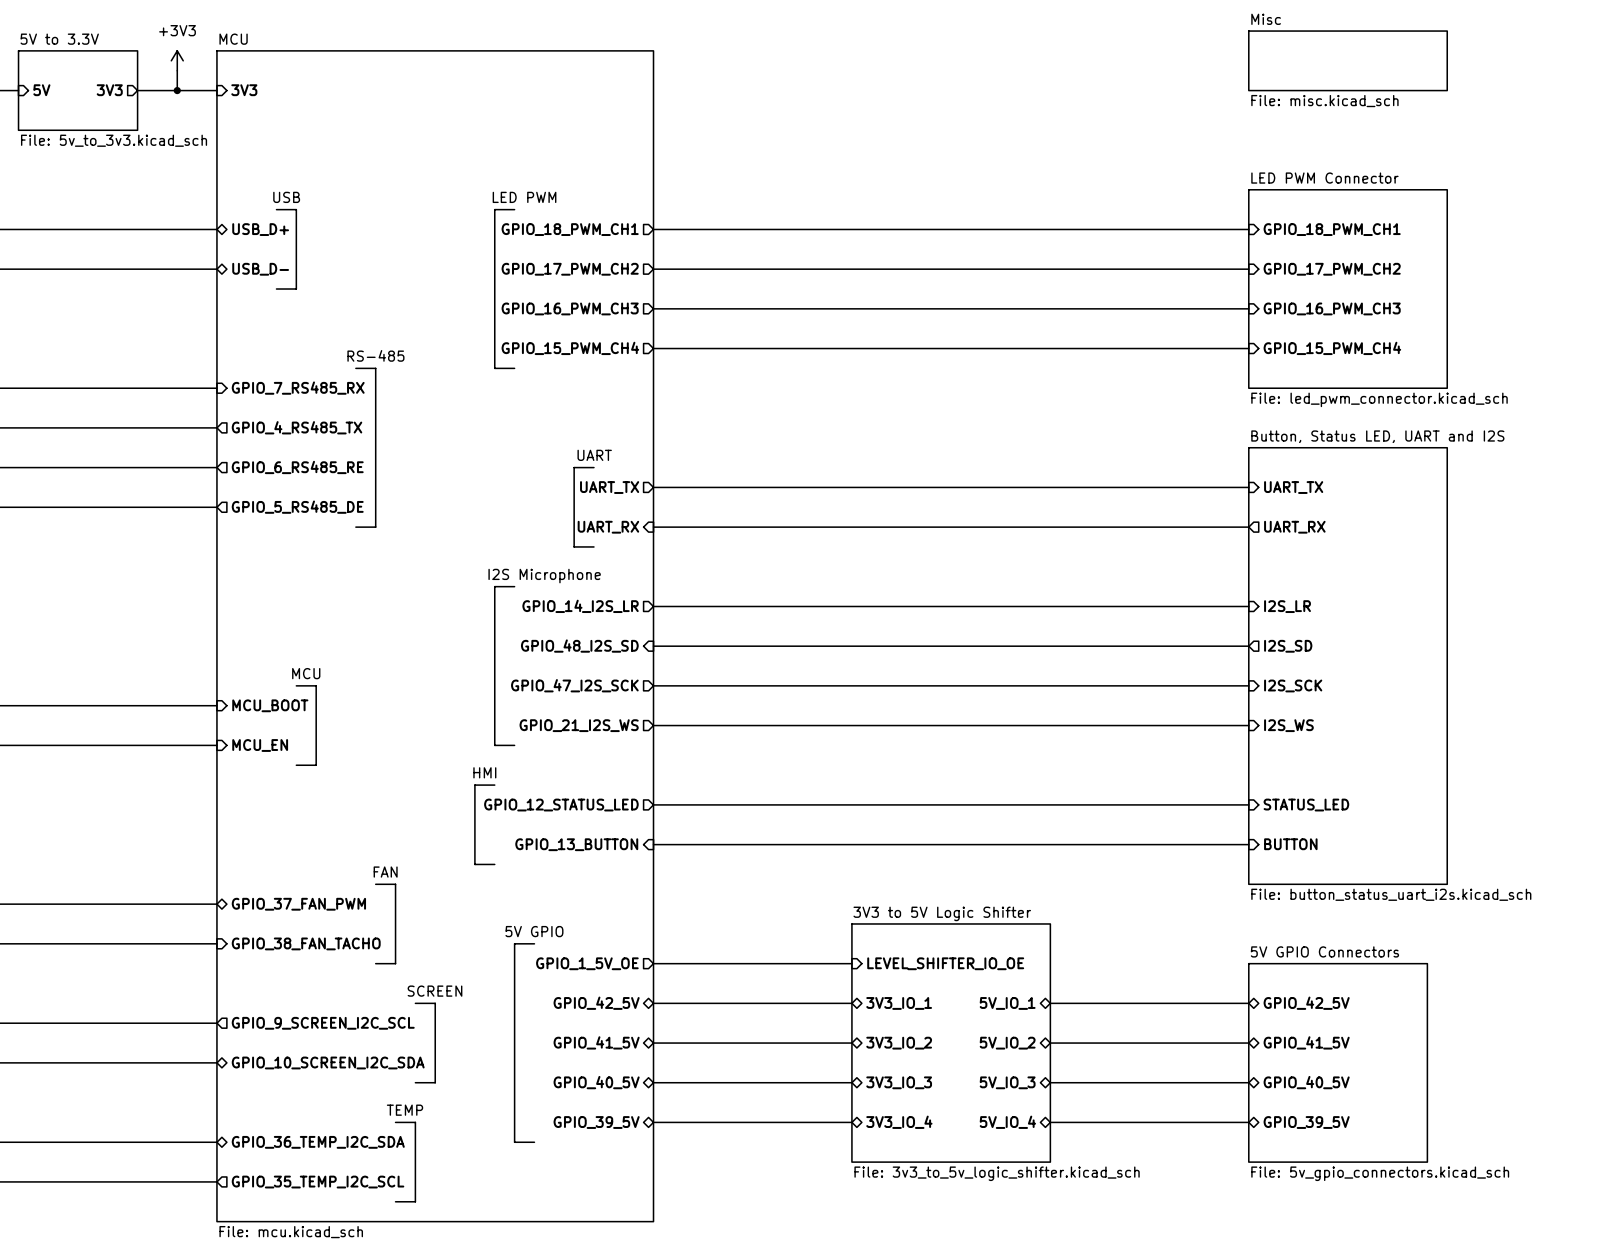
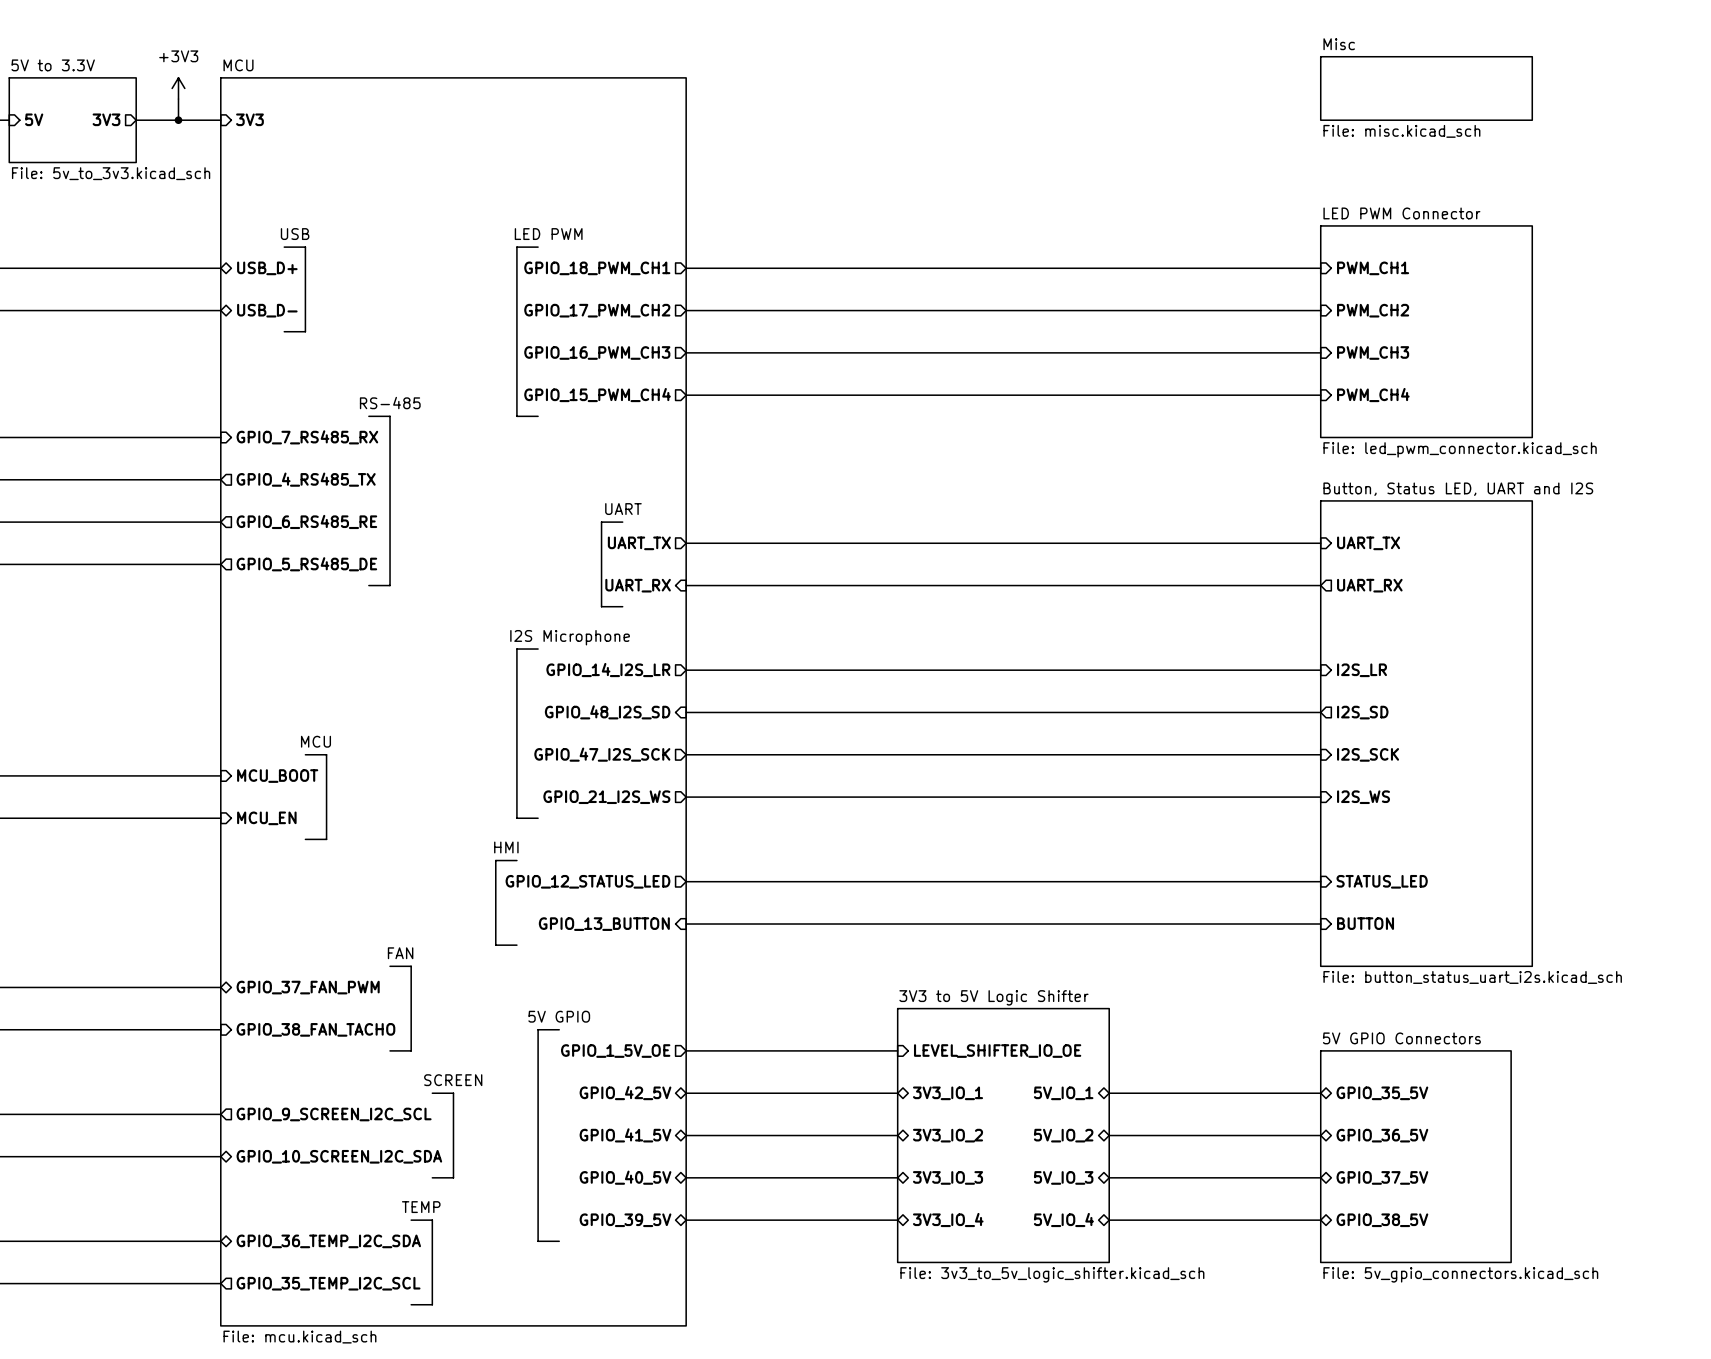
sheet pin: GPIO_18_PWM_CH1 (1332, 229) -> PWM_CH1 (1373, 268)
sheet pin: GPIO_17_PWM_CH2 (1332, 269) -> PWM_CH2 (1373, 310)
sheet pin: GPIO_16_PWM_CH3 (1332, 308) -> PWM_CH3 (1373, 352)
sheet pin: GPIO_15_PWM_CH4 (1332, 348) -> PWM_CH4 (1373, 395)
sheet pin: GPIO_42_5V (1306, 1003) -> GPIO_35_5V (1382, 1093)
sheet pin: GPIO_41_5V (1306, 1042) -> GPIO_36_5V (1382, 1135)
sheet pin: GPIO_40_5V (1306, 1082) -> GPIO_37_5V (1382, 1177)
sheet pin: GPIO_39_5V (1306, 1122) -> GPIO_38_5V (1382, 1220)

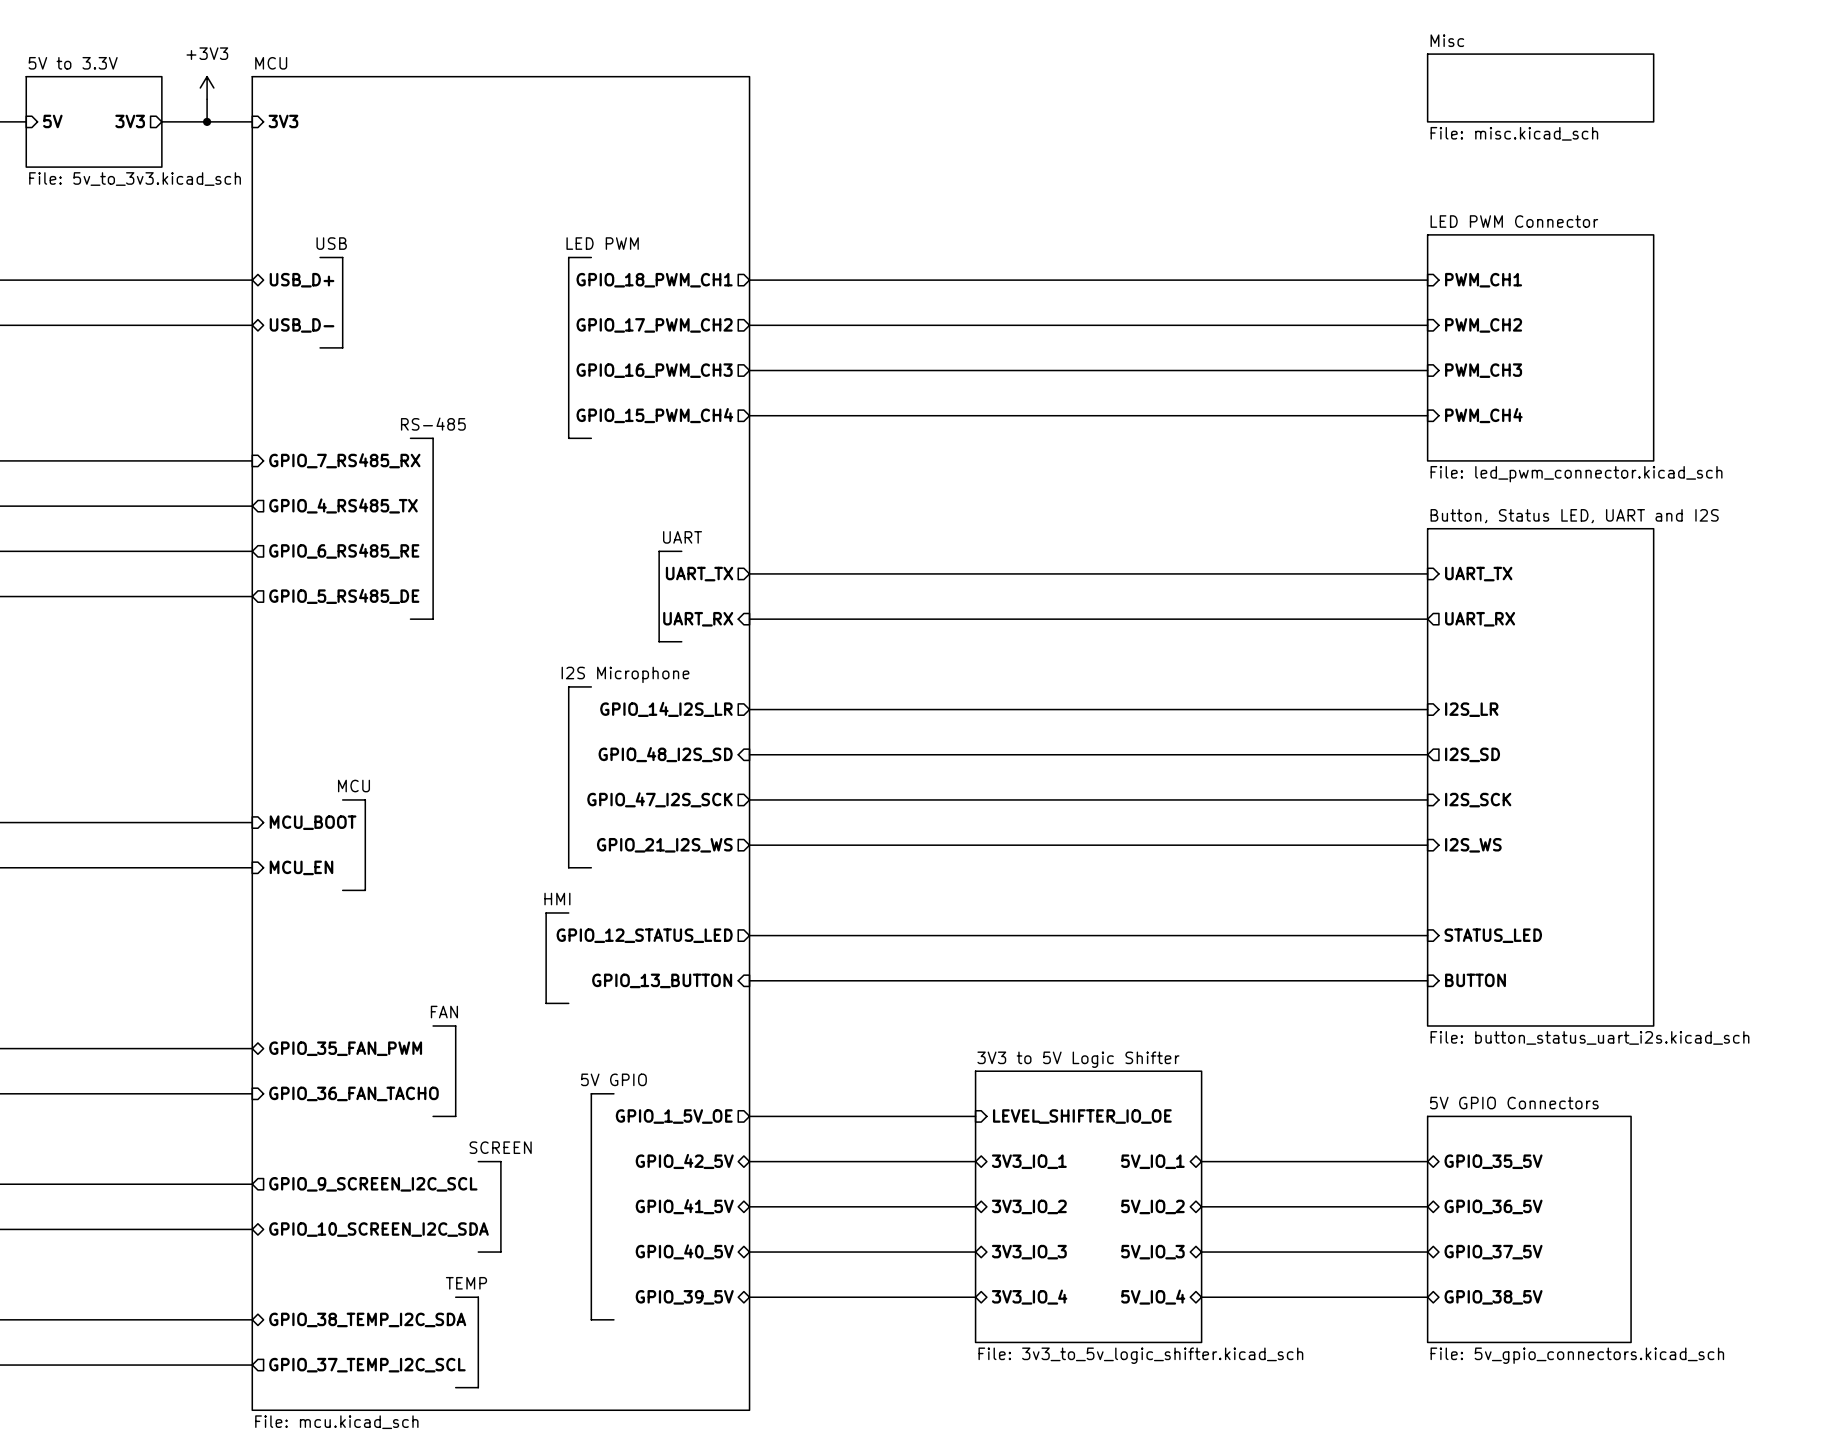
sheet pin: GPIO_37_FAN_PWM (308, 987) -> GPIO_35_FAN_PWM (345, 1048)
sheet pin: GPIO_38_FAN_TACHO (315, 1029) -> GPIO_36_FAN_TACHO (353, 1093)
sheet pin: GPIO_36_TEMP_I2C_SDA (328, 1241) -> GPIO_38_TEMP_I2C_SDA (367, 1319)
sheet pin: GPIO_35_TEMP_I2C_SCL (328, 1283) -> GPIO_37_TEMP_I2C_SCL (367, 1365)

